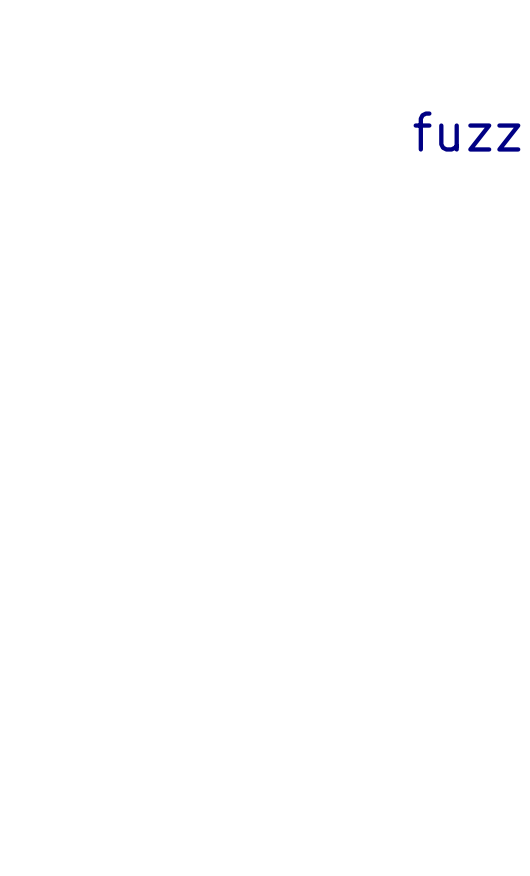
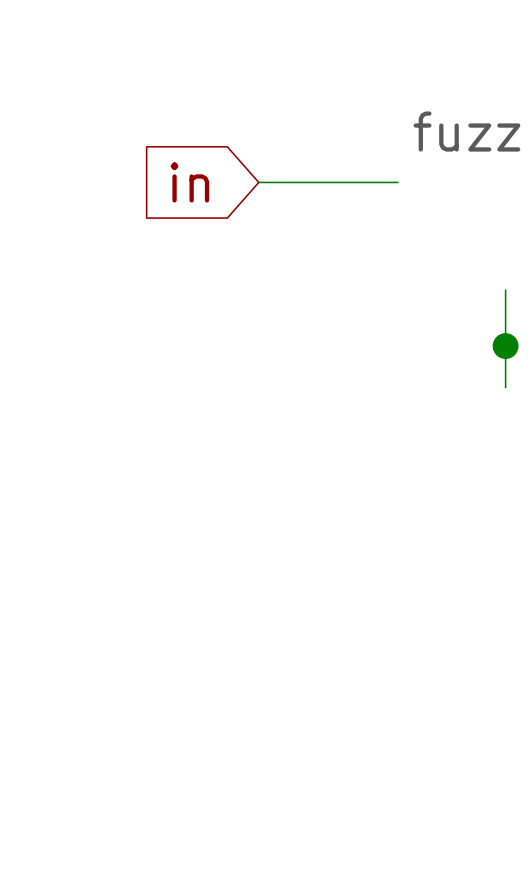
global label: none -> in (189, 182)
wire: none -> (258, 182) (397, 182)
wire: none -> (505, 290) (505, 387)
junction: none -> (505, 346)

